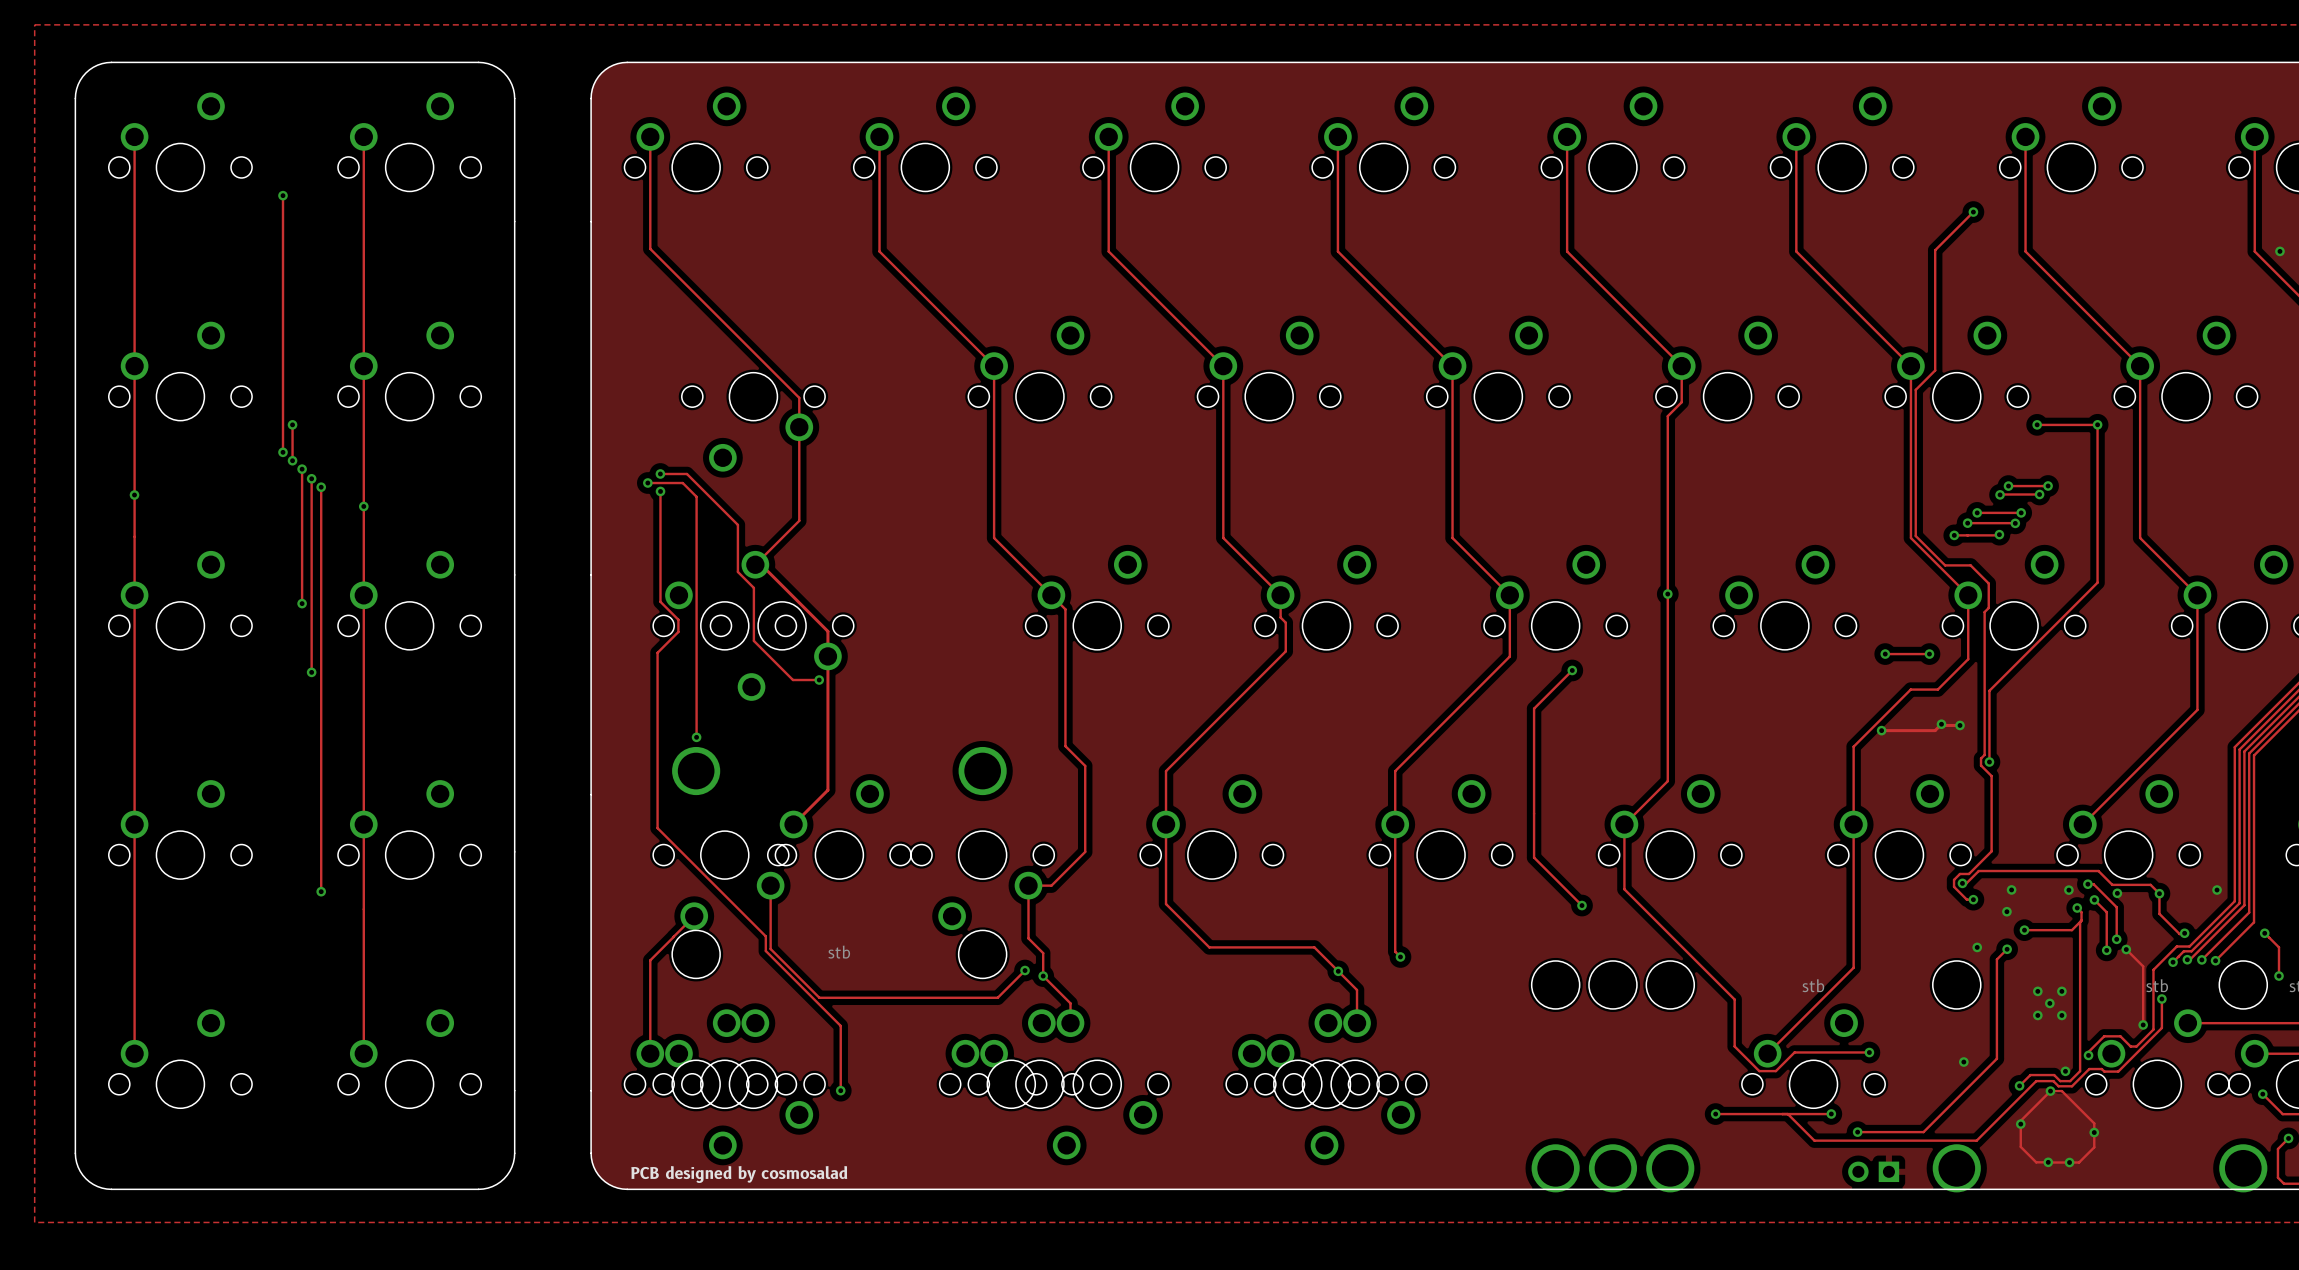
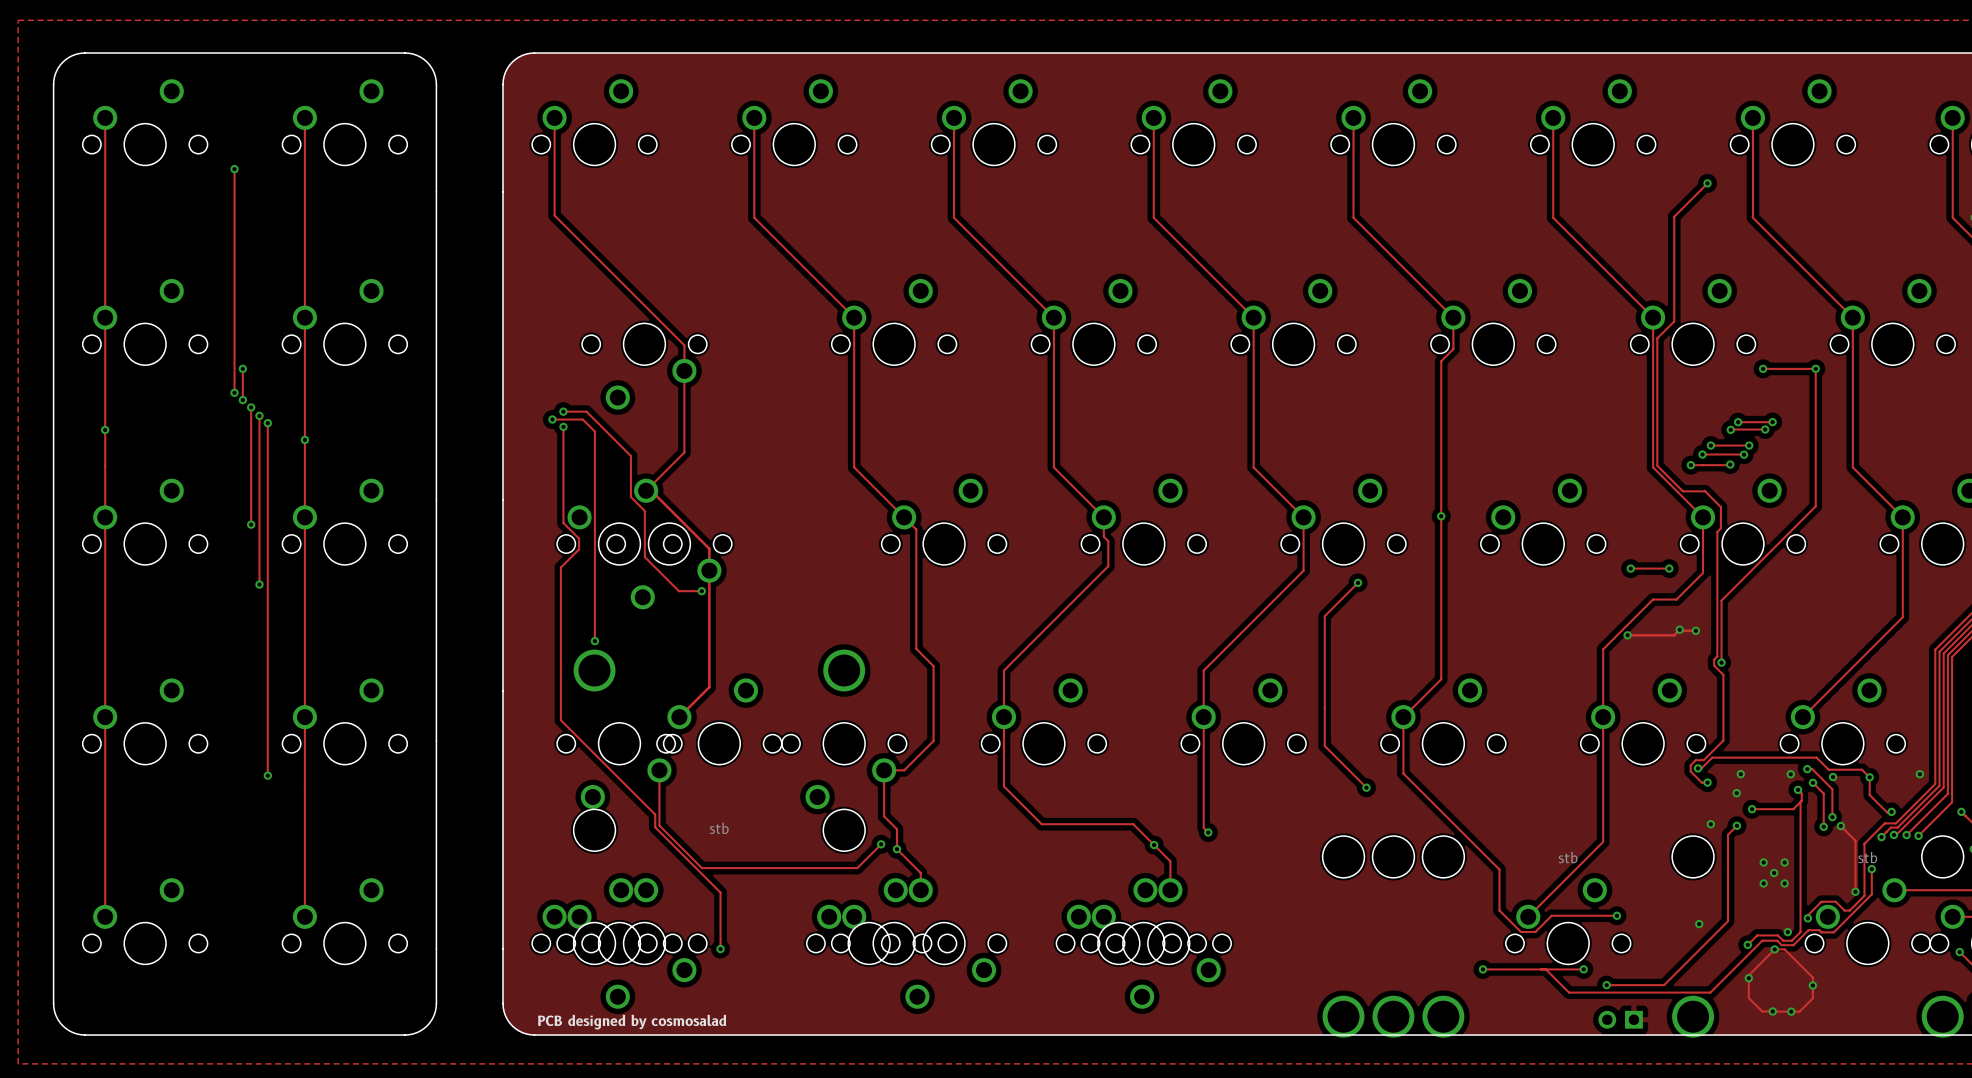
track: (694, 916) (673, 936) -> none
track: (673, 936) (650, 960) (650, 1053) -> none

